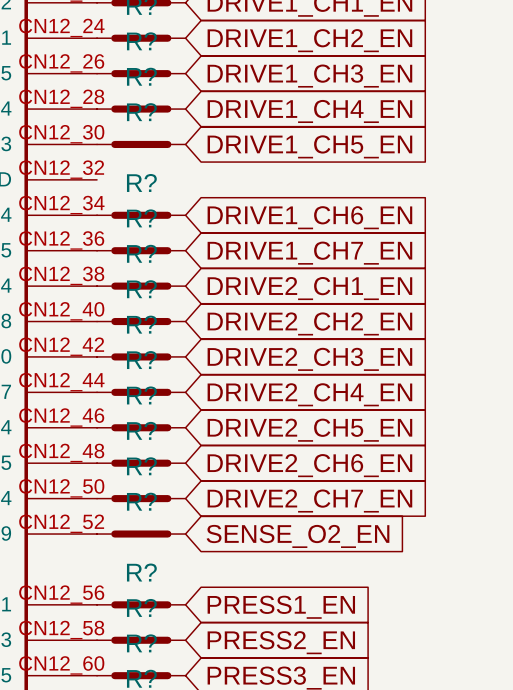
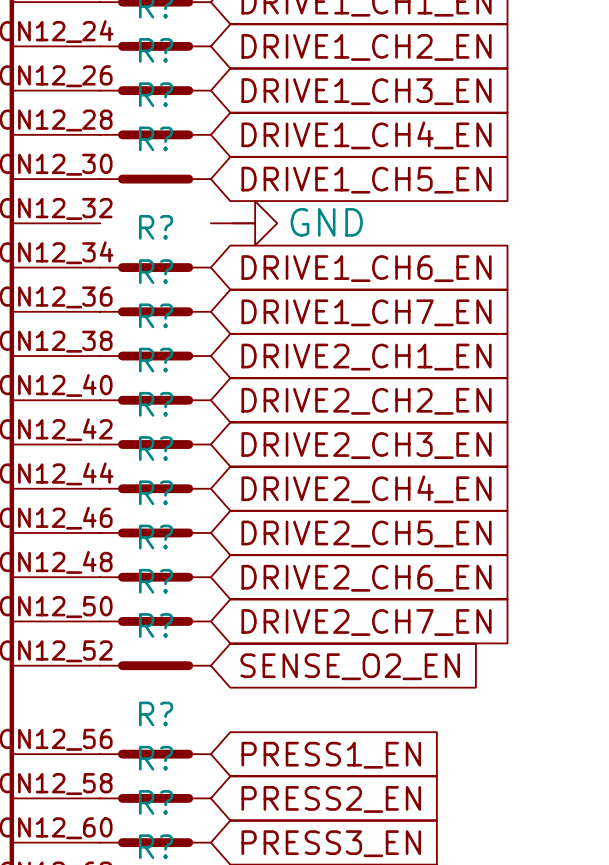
power symbol: none -> GND (244, 223)

